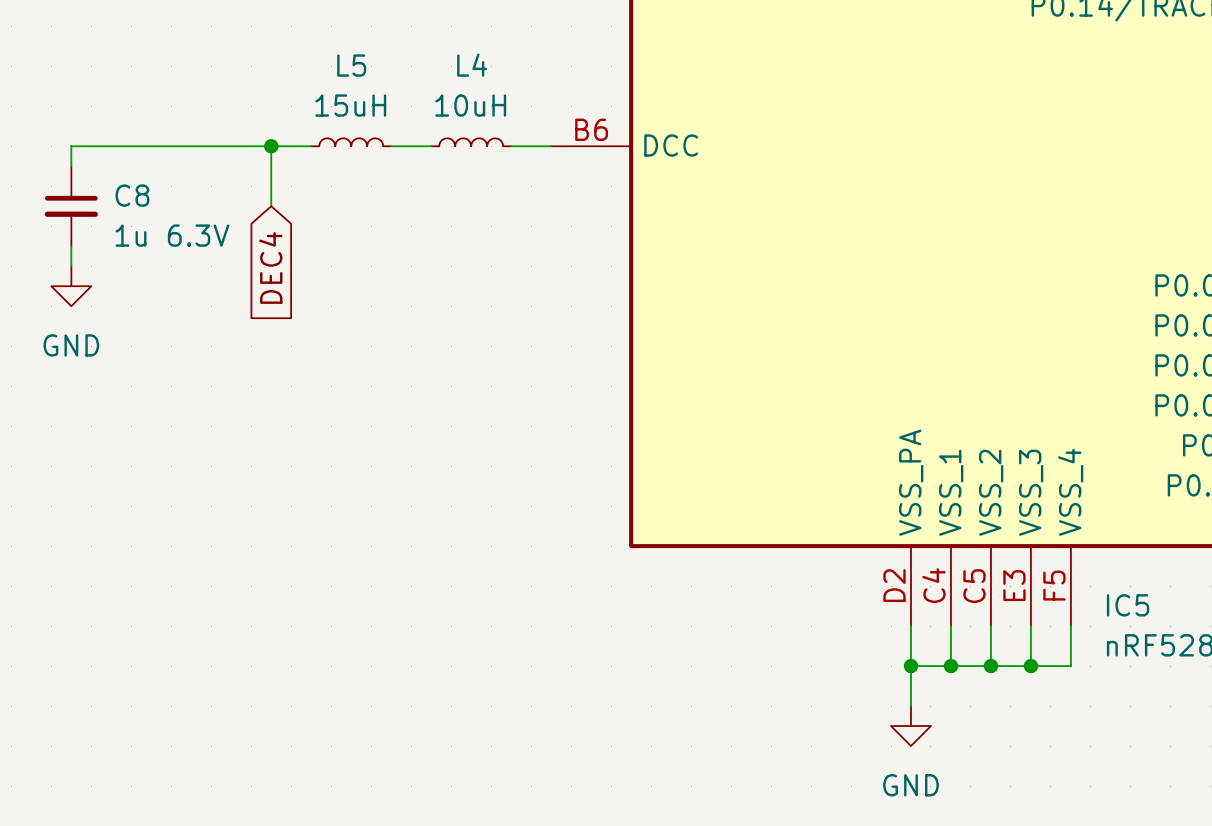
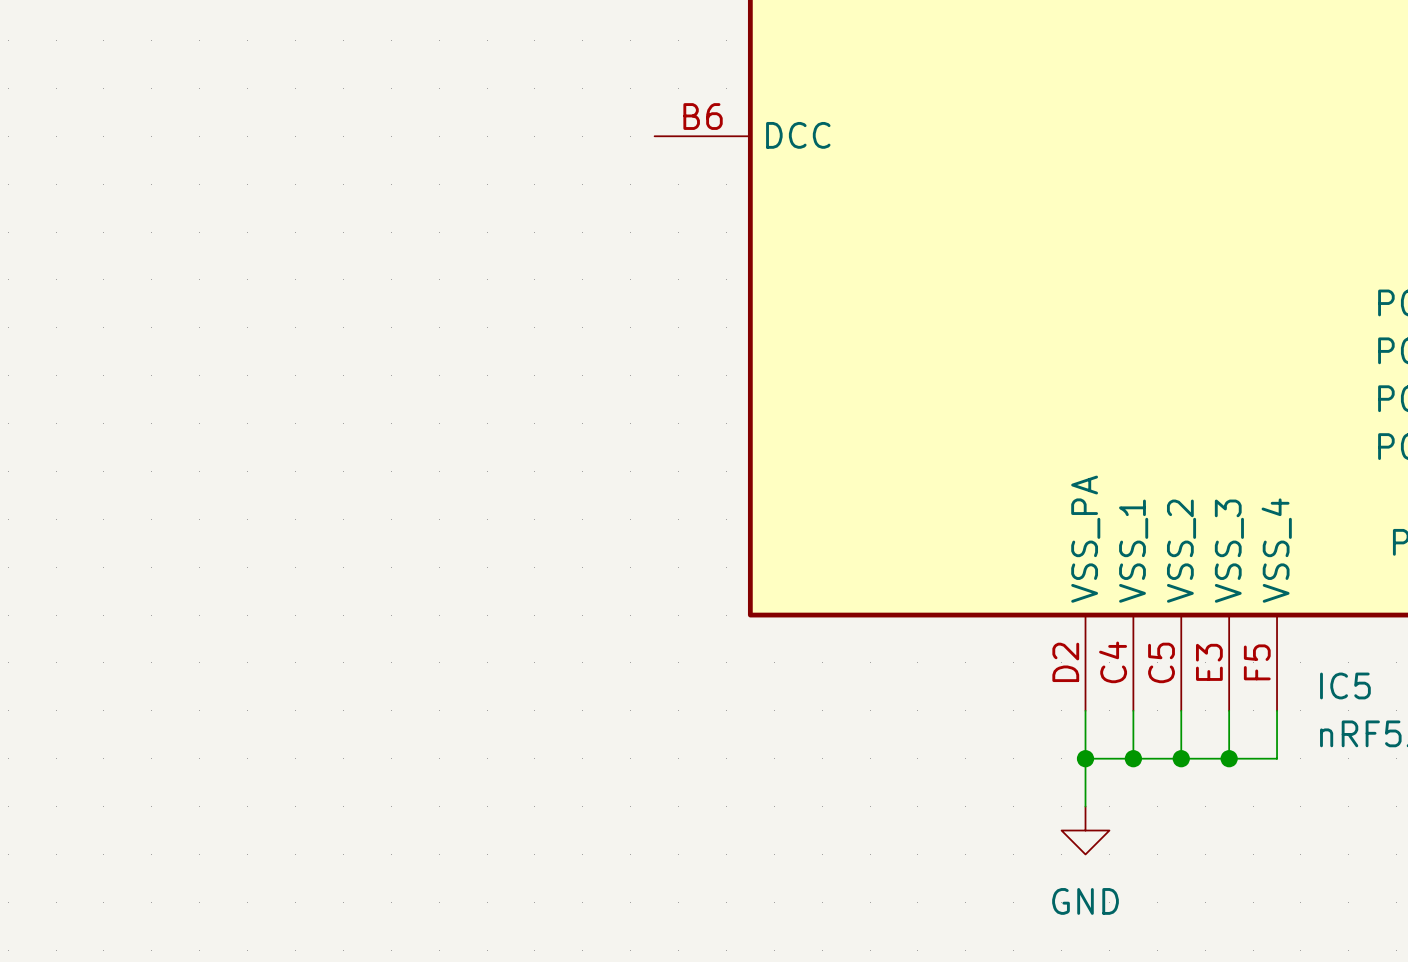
L5: 15uH (351, 142) -> none
L4: 10uH (471, 142) -> none
wire: (271, 146) (271, 206) -> none
junction: (271, 146) -> none
wire: (311, 146) (71, 146) (71, 166) -> none
wire: (391, 146) (431, 146) -> none
wire: (511, 146) (551, 146) -> none
C8: 1u 6.3V (71, 206) -> none
wire: (71, 246) (71, 266) -> none
global label: DEC4 (270, 267) -> none
power symbol: GND (71, 286) -> none

